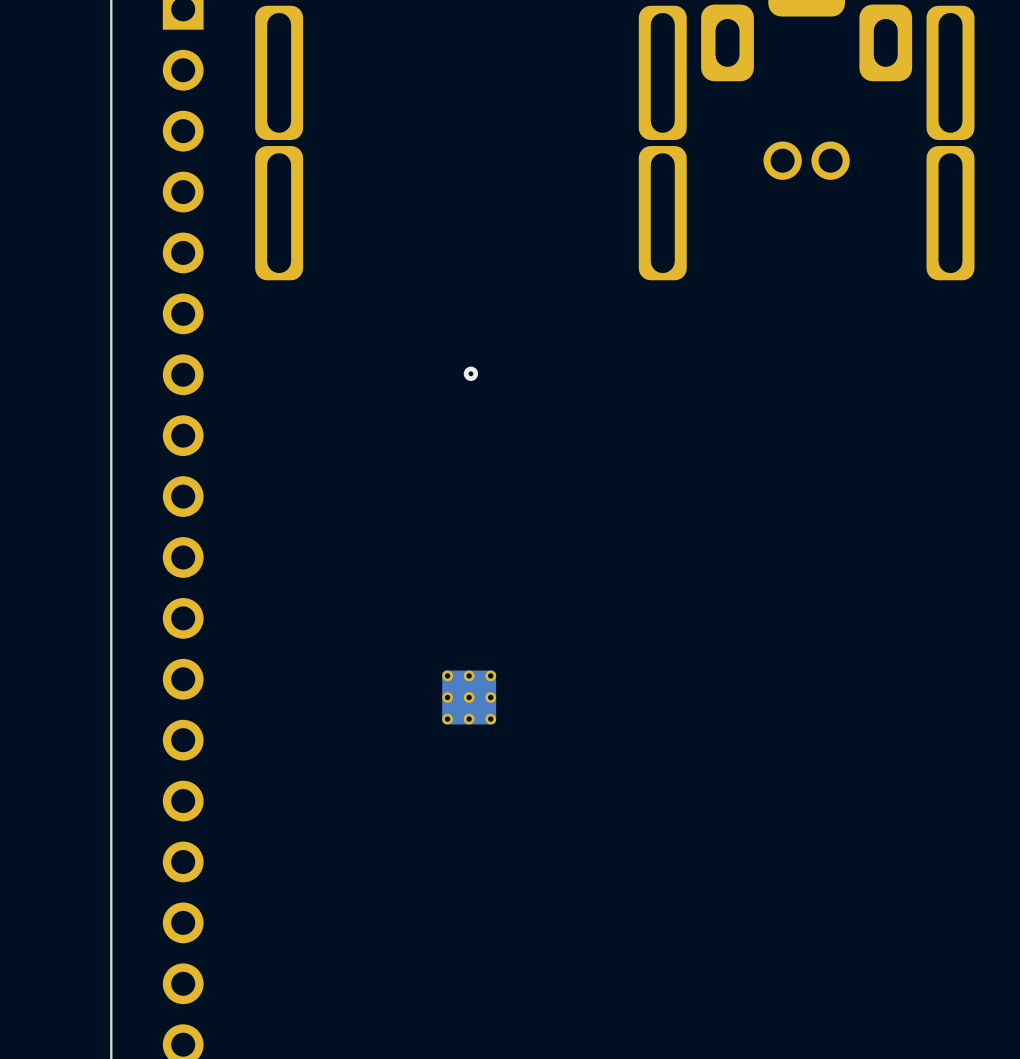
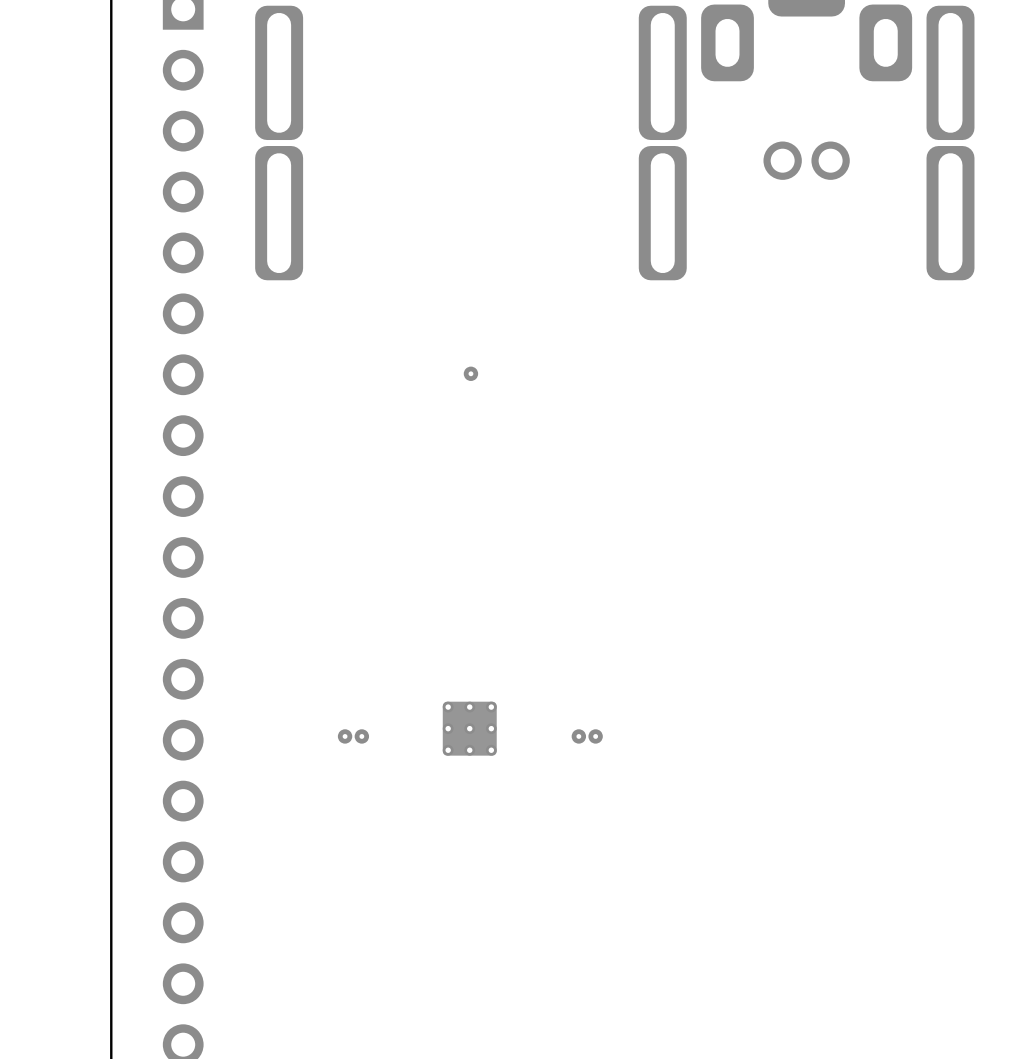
part position: (469, 697) -> (469, 728)
via: none -> (345, 736)
via: none -> (361, 736)
via: none -> (578, 736)
via: none -> (595, 736)

